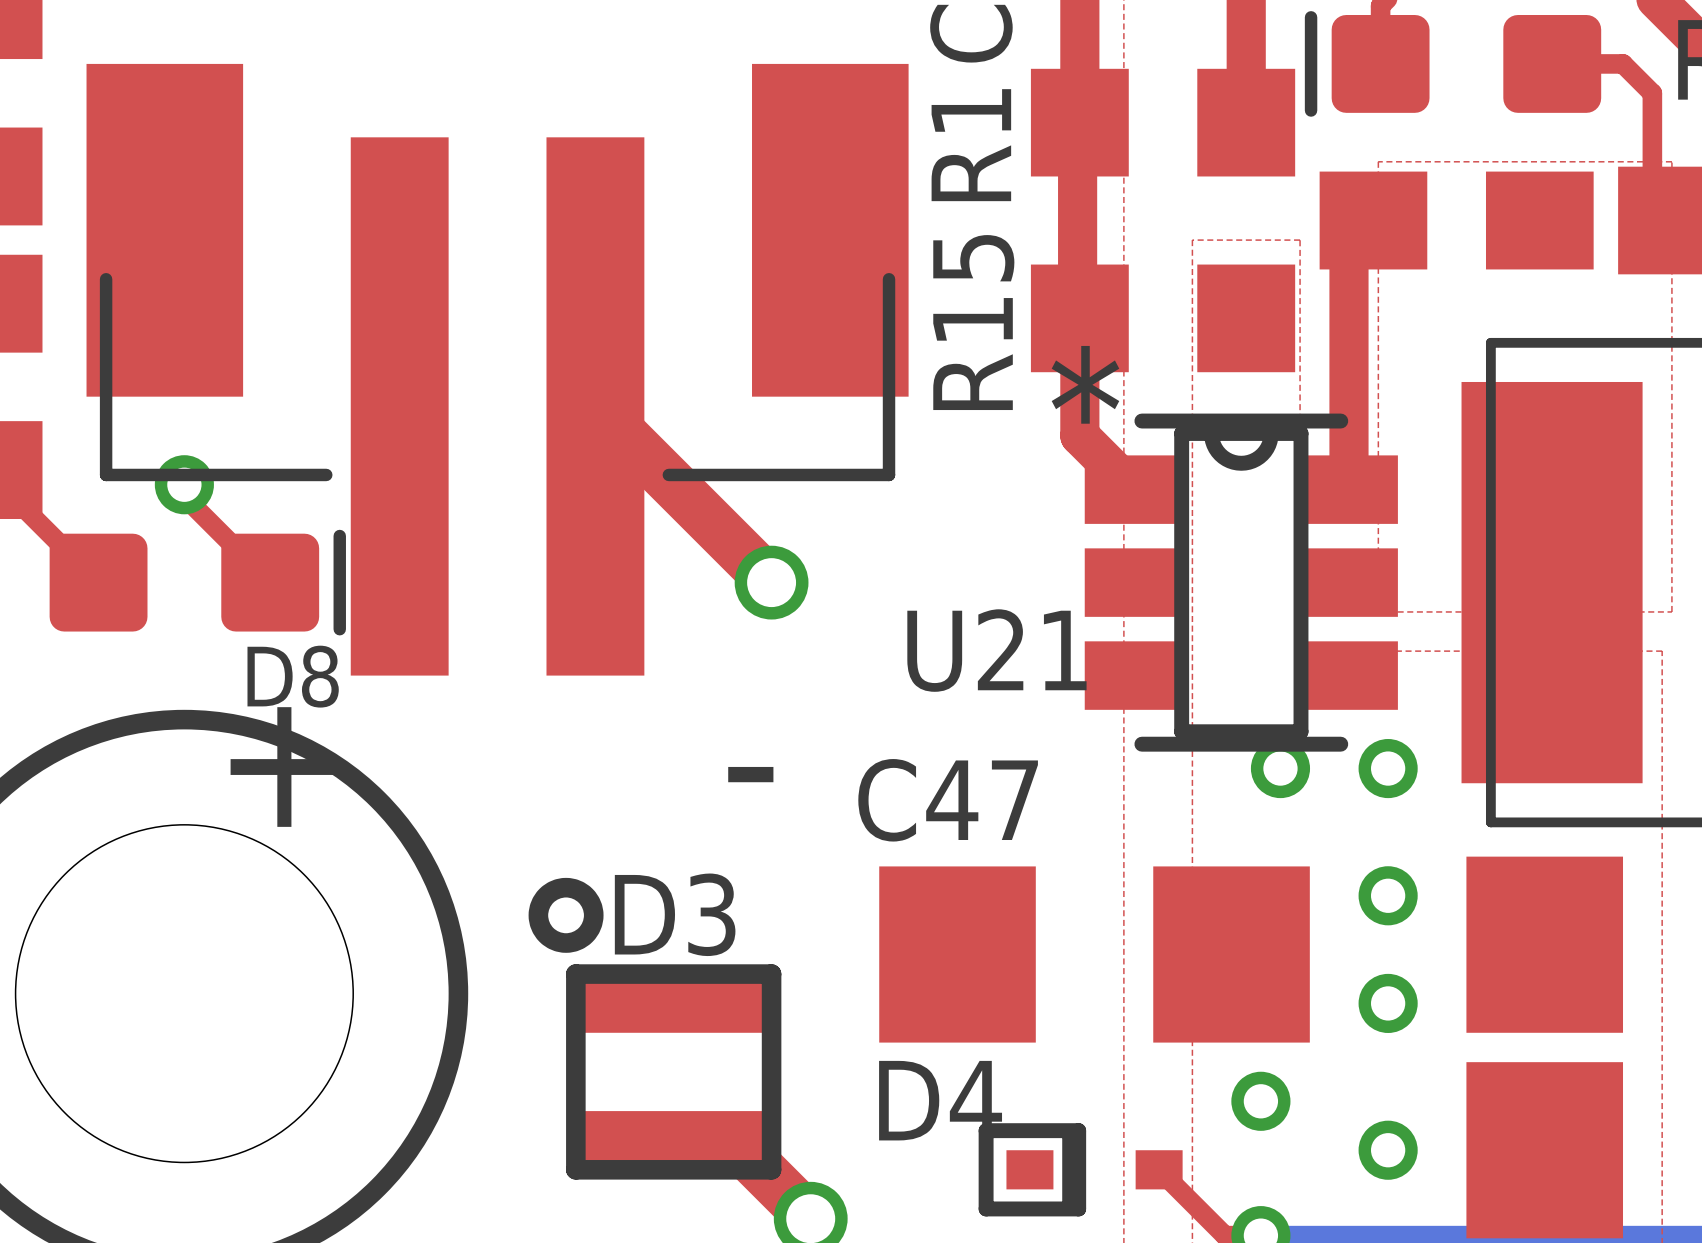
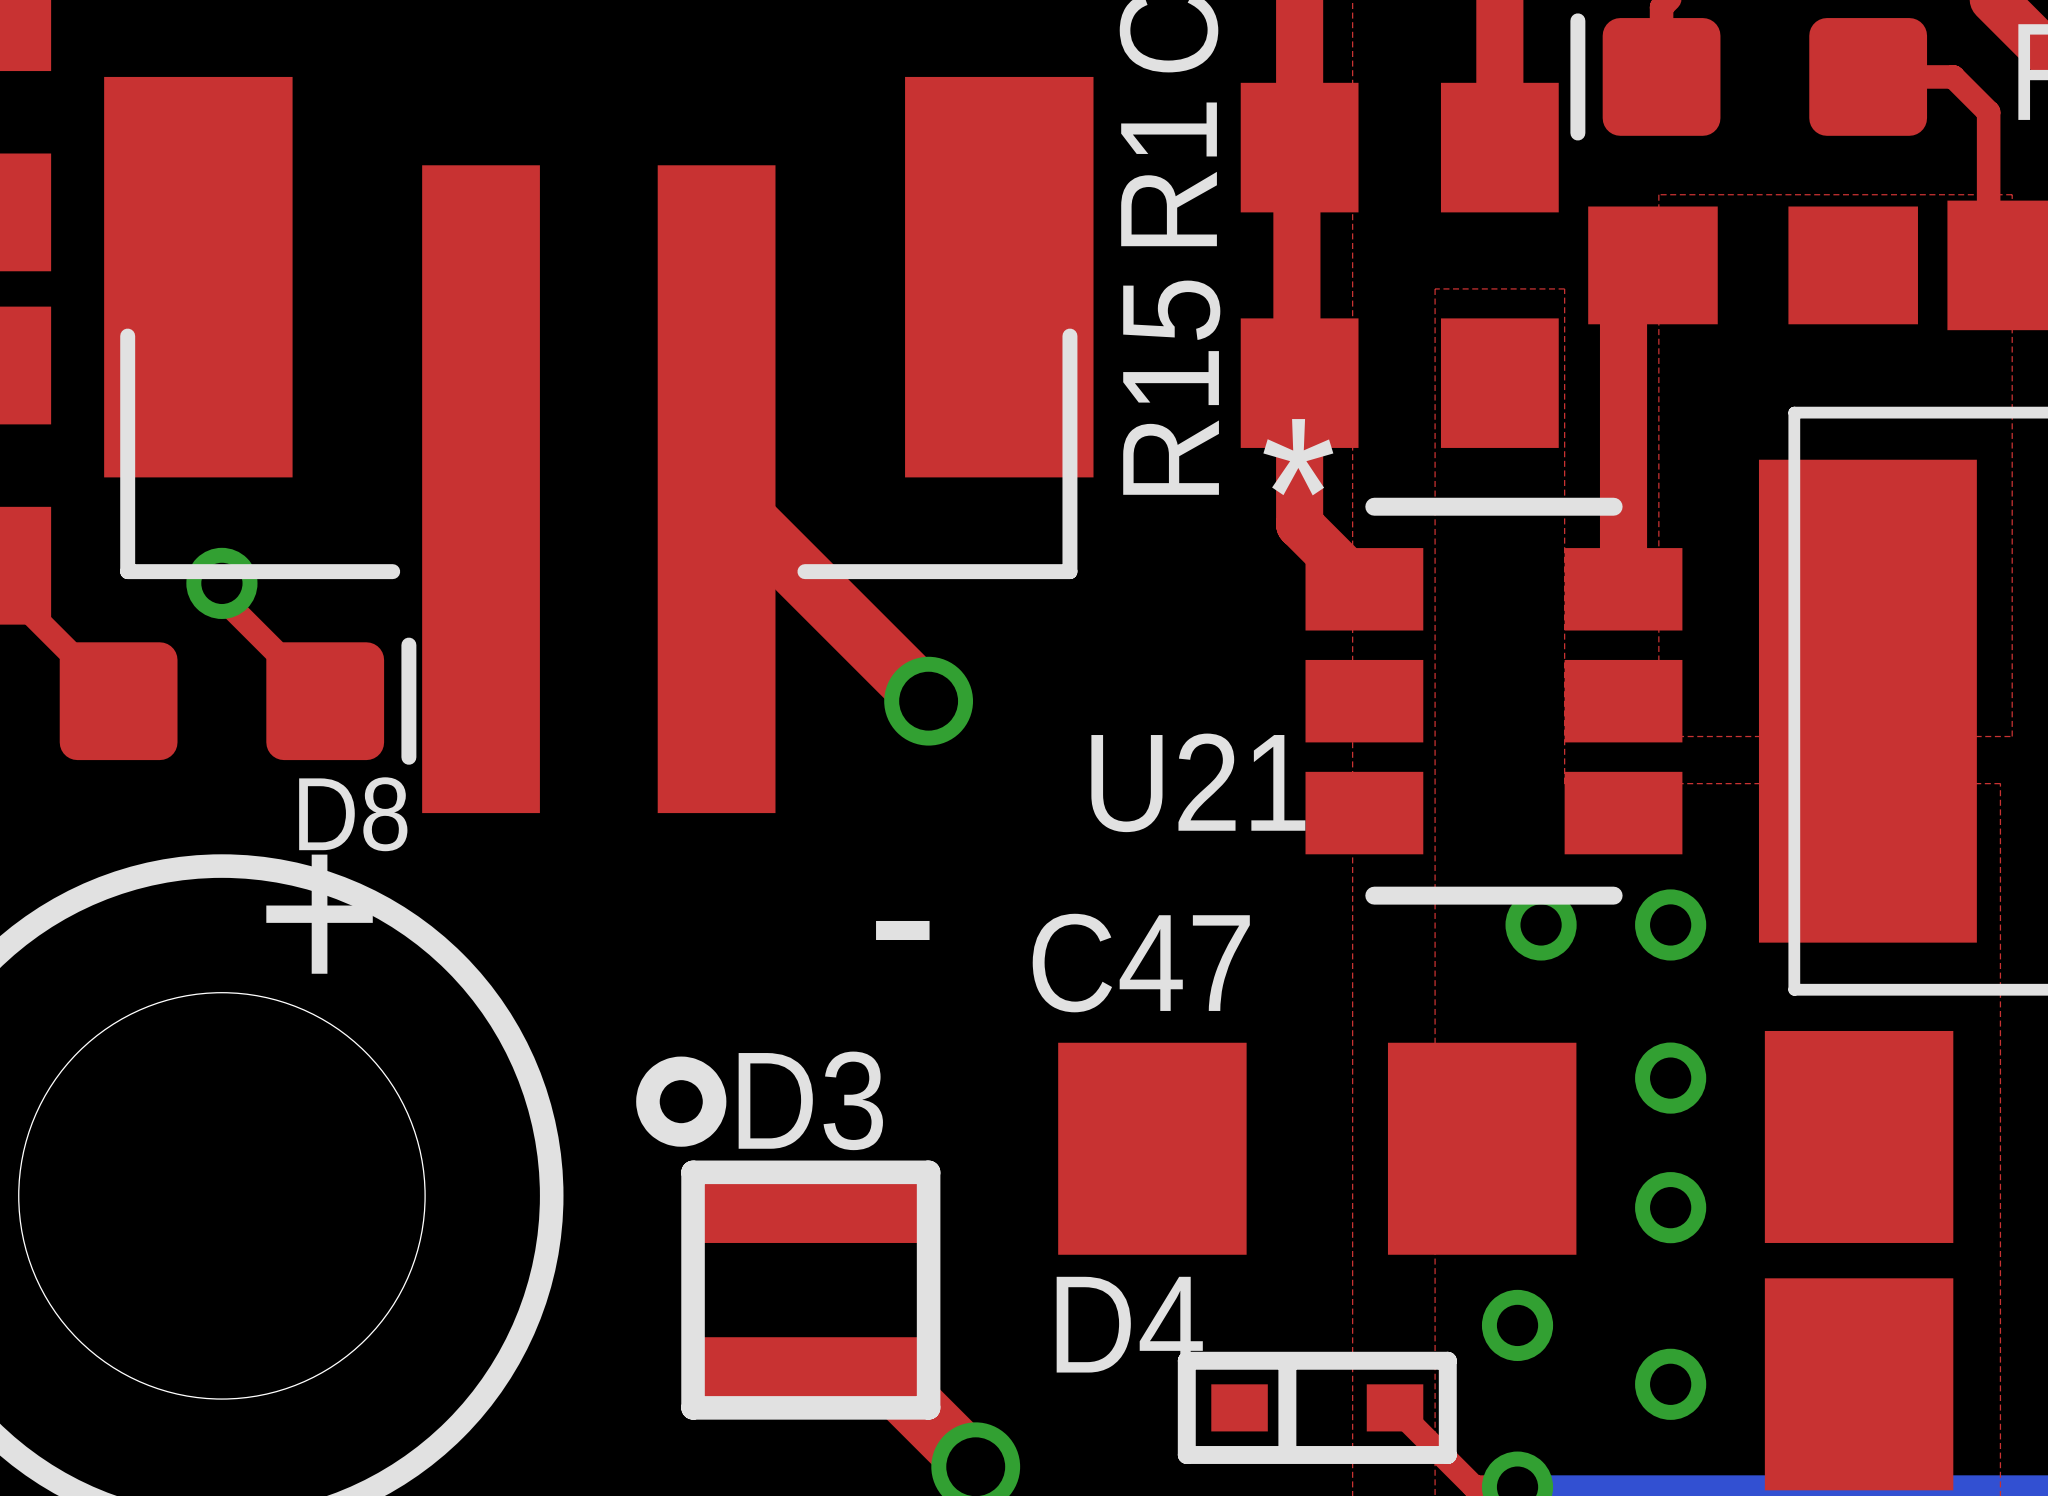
U21 footprint: [1084, 413, 1398, 752] -> [1305, 497, 1683, 905]
D4 footprint: [978, 1123, 1183, 1217] -> [1177, 1351, 1457, 1464]

